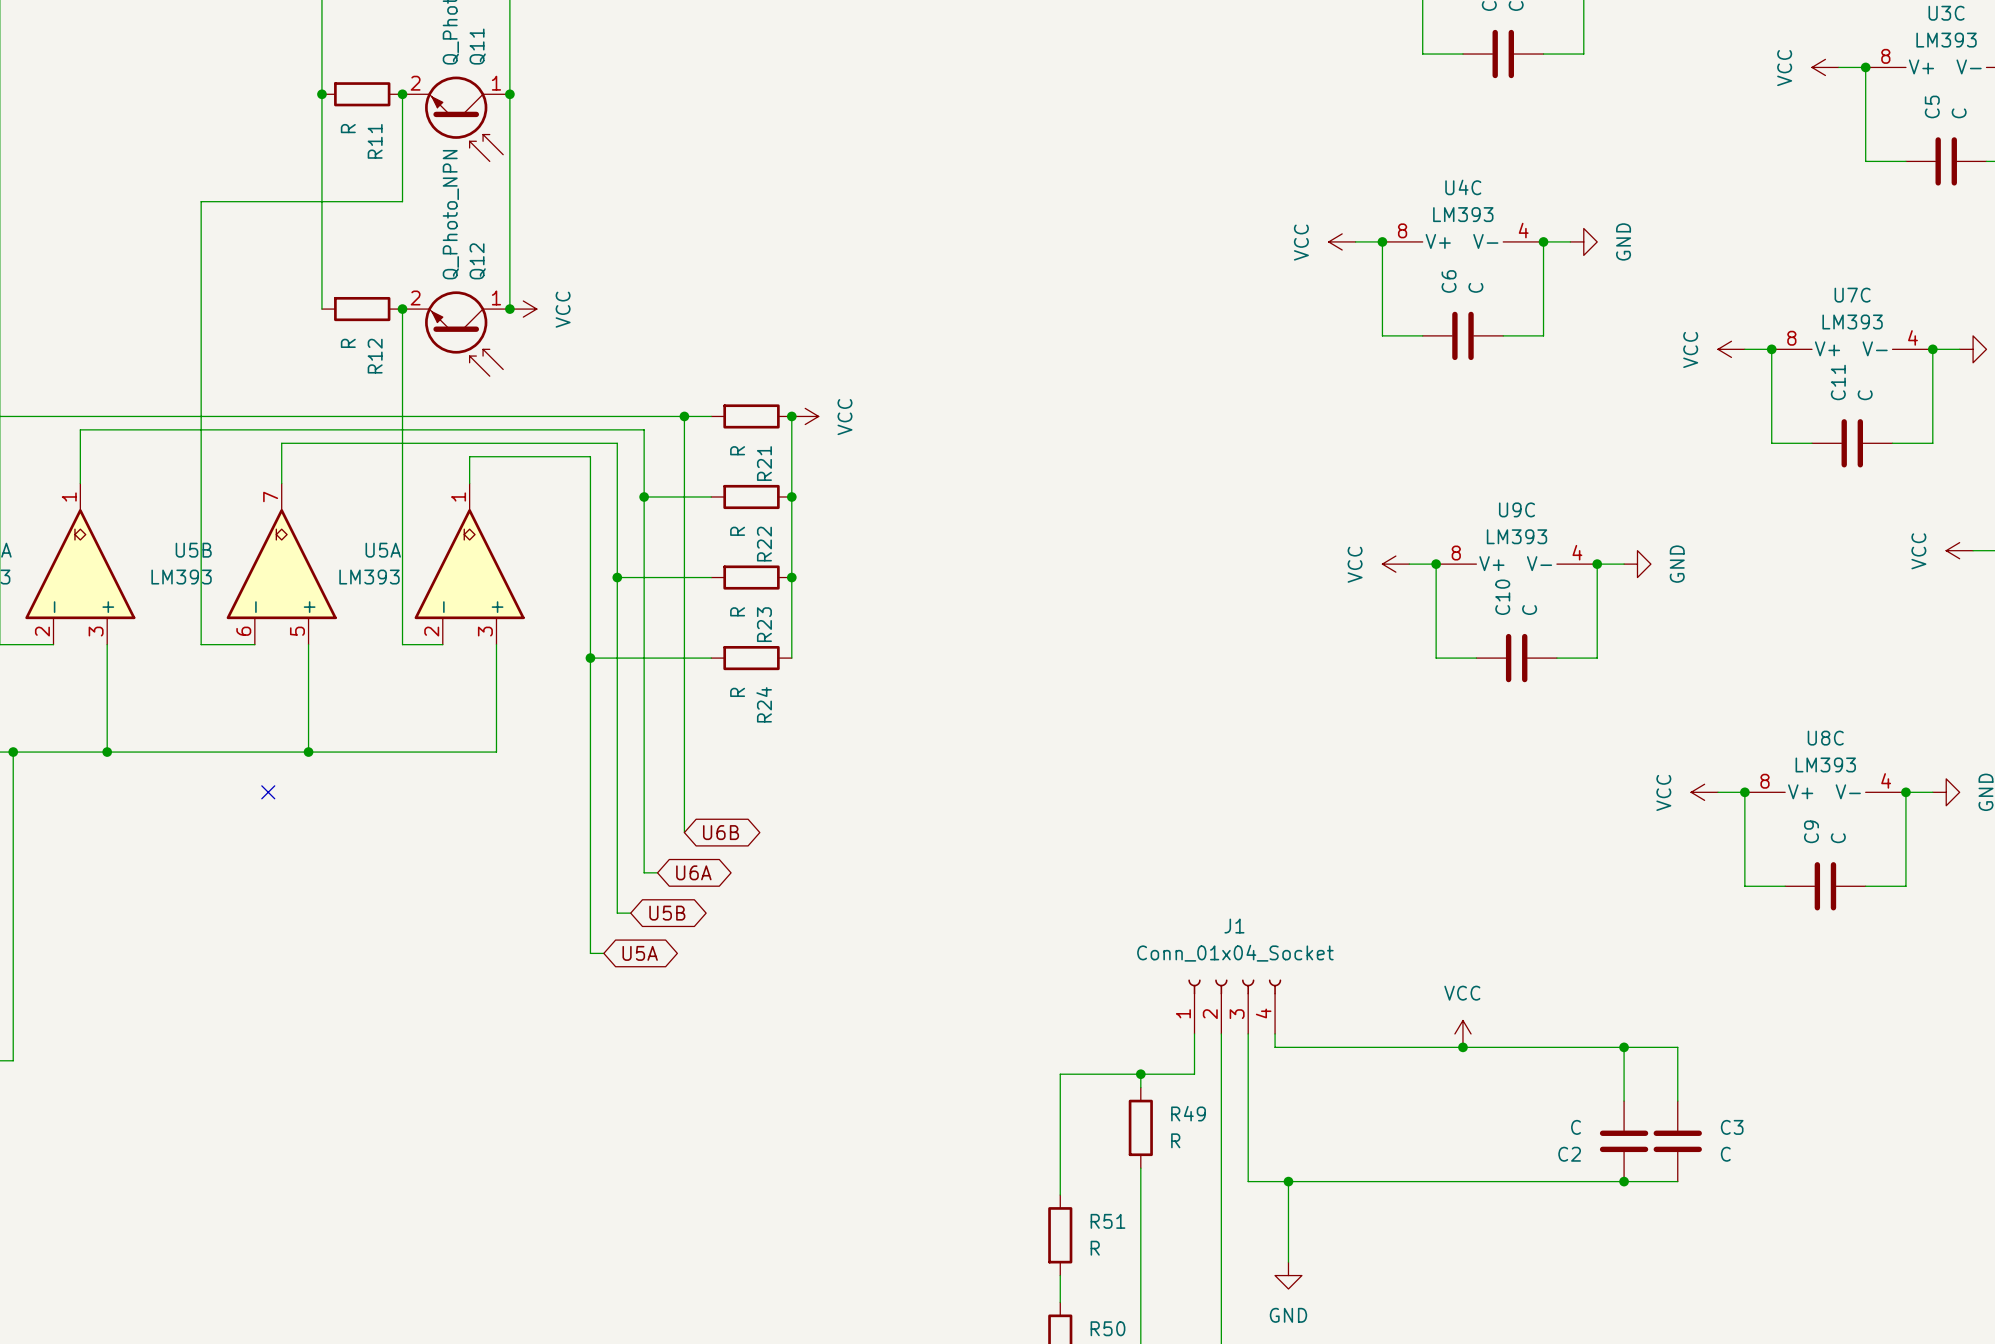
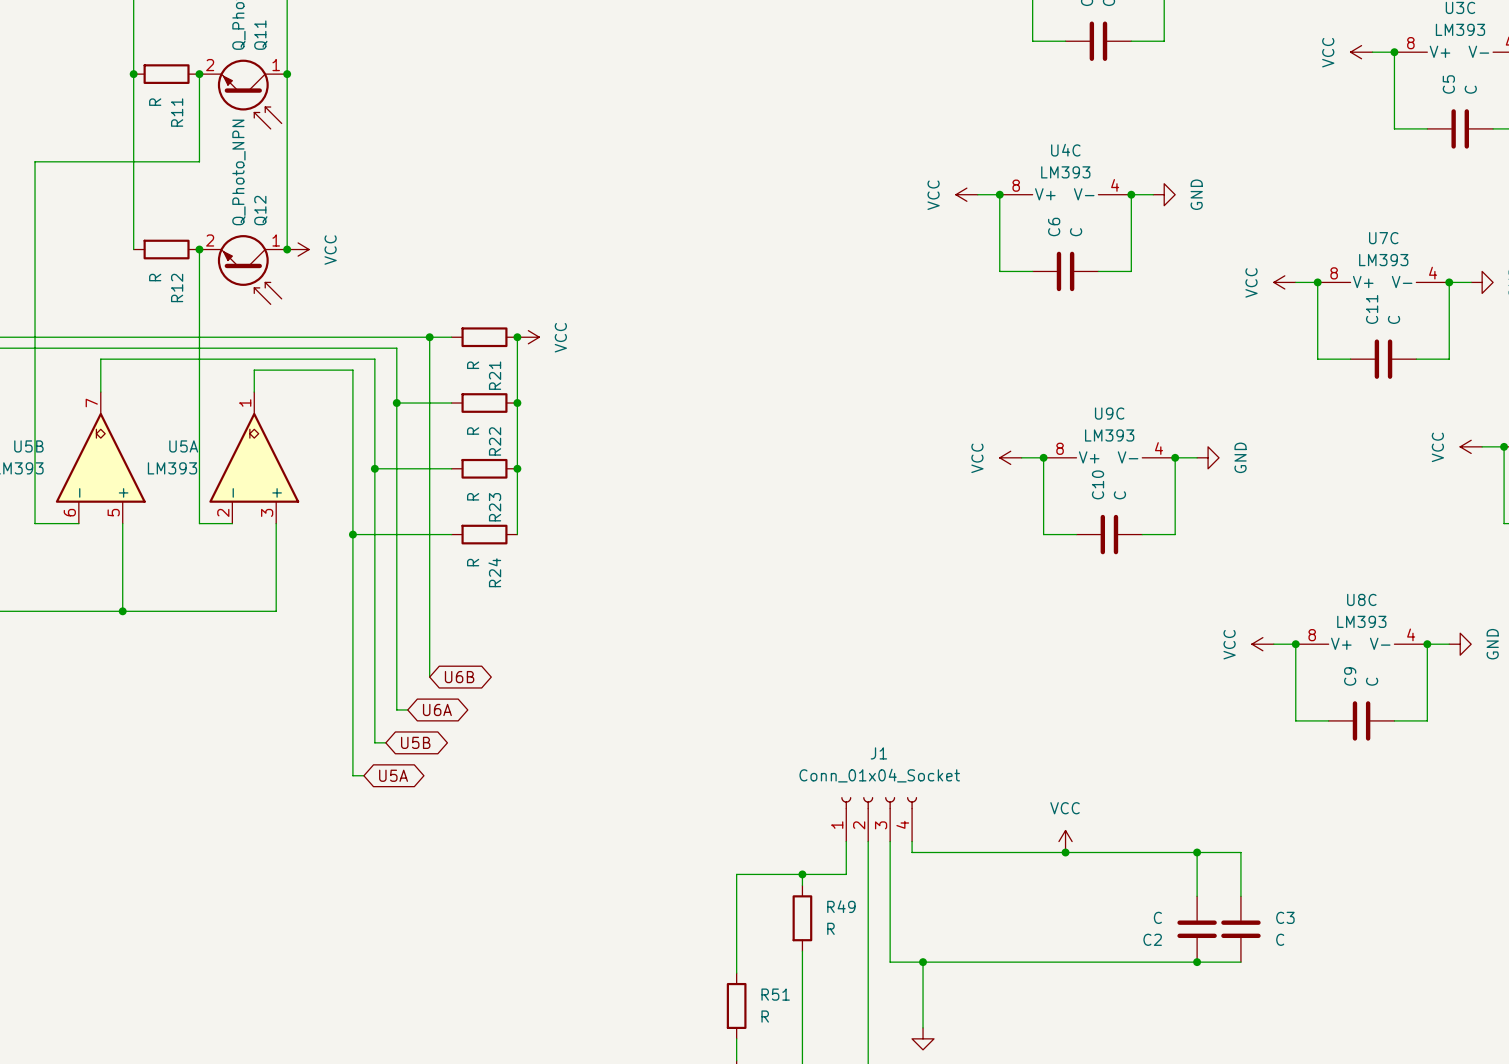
no-connect mark: (268, 792) -> none

